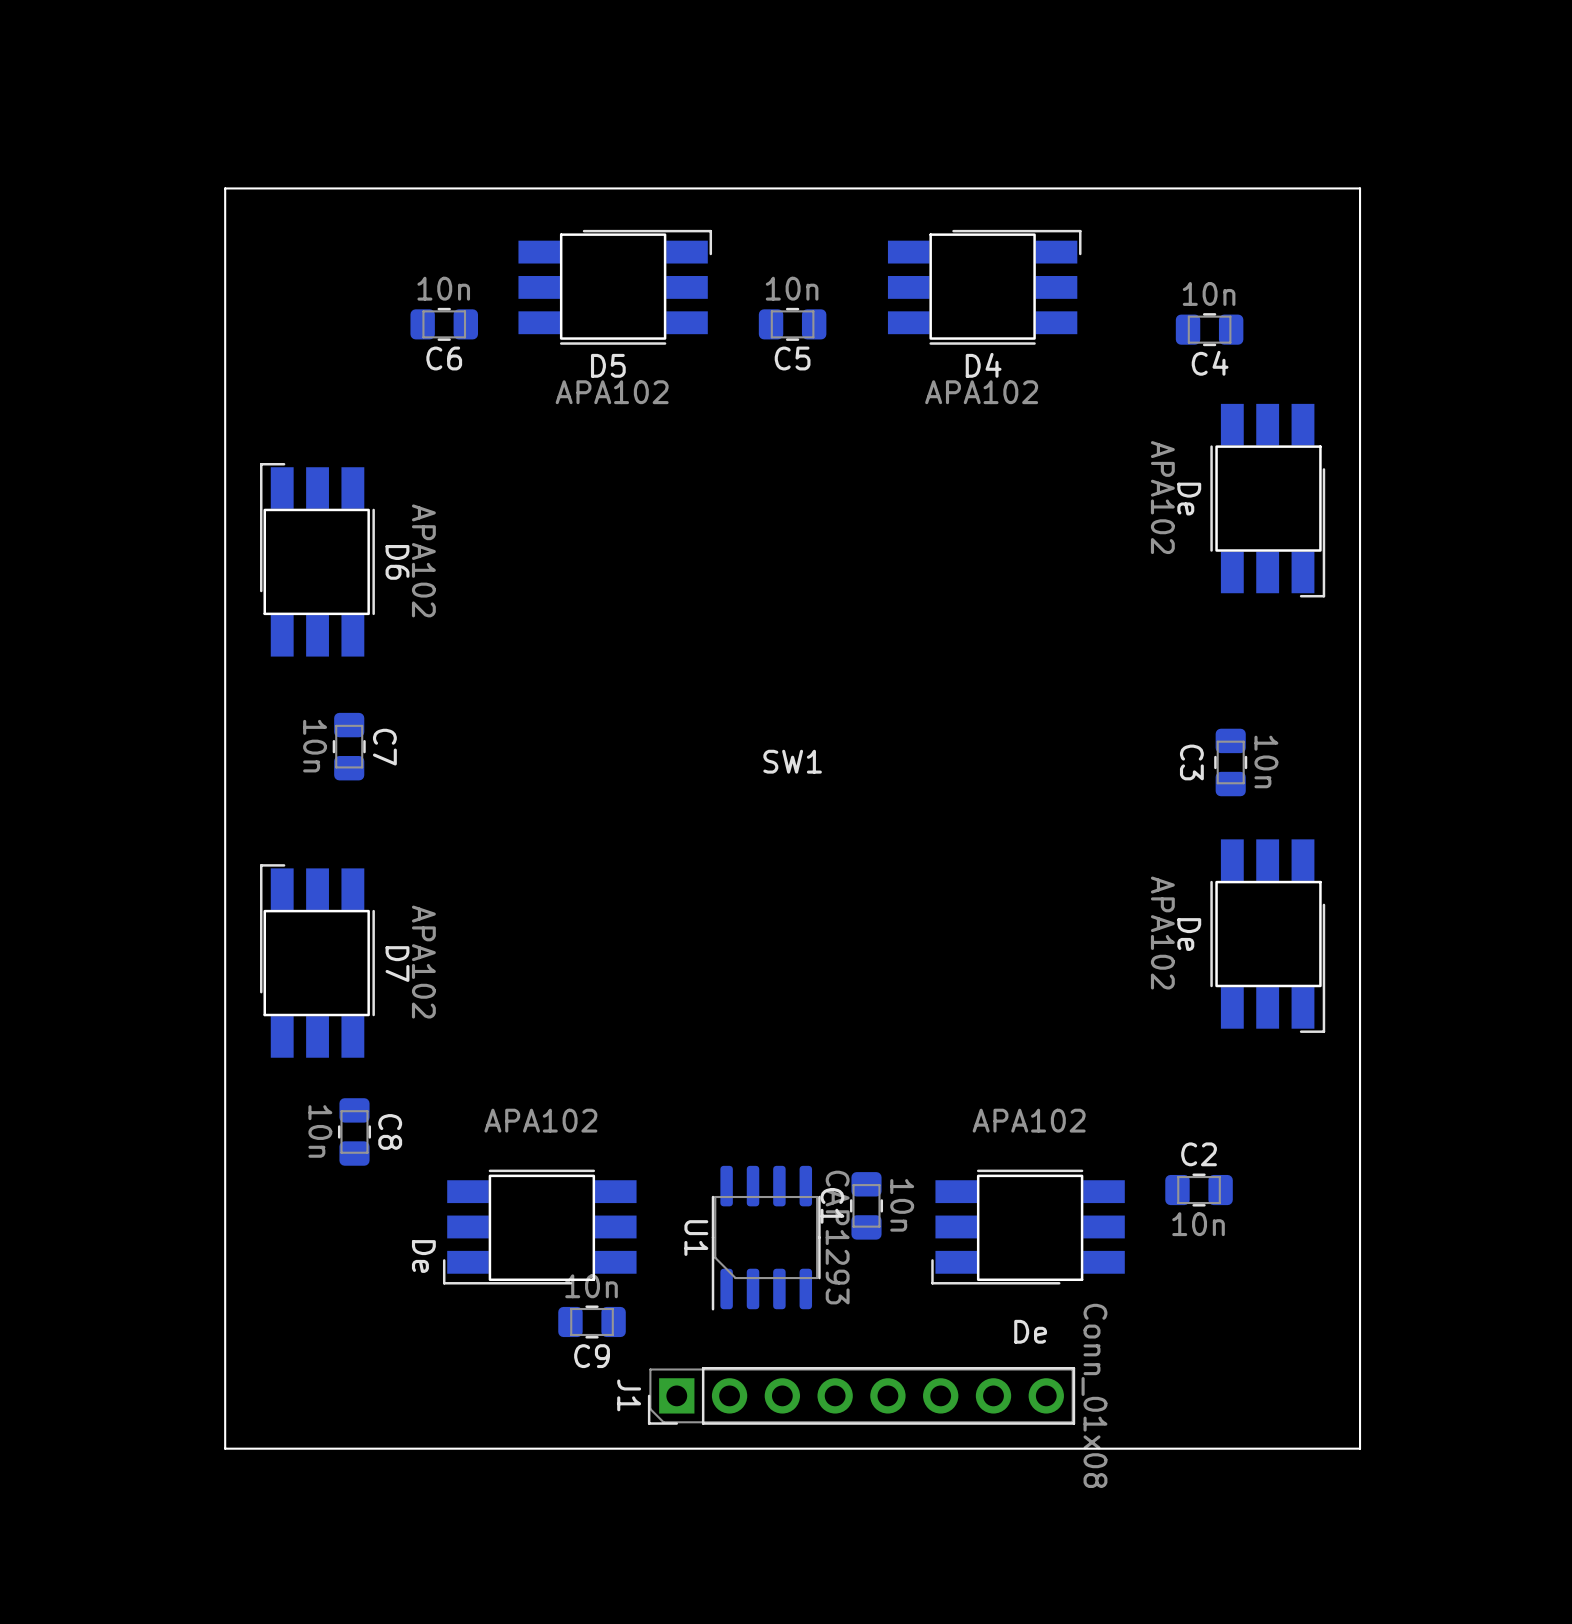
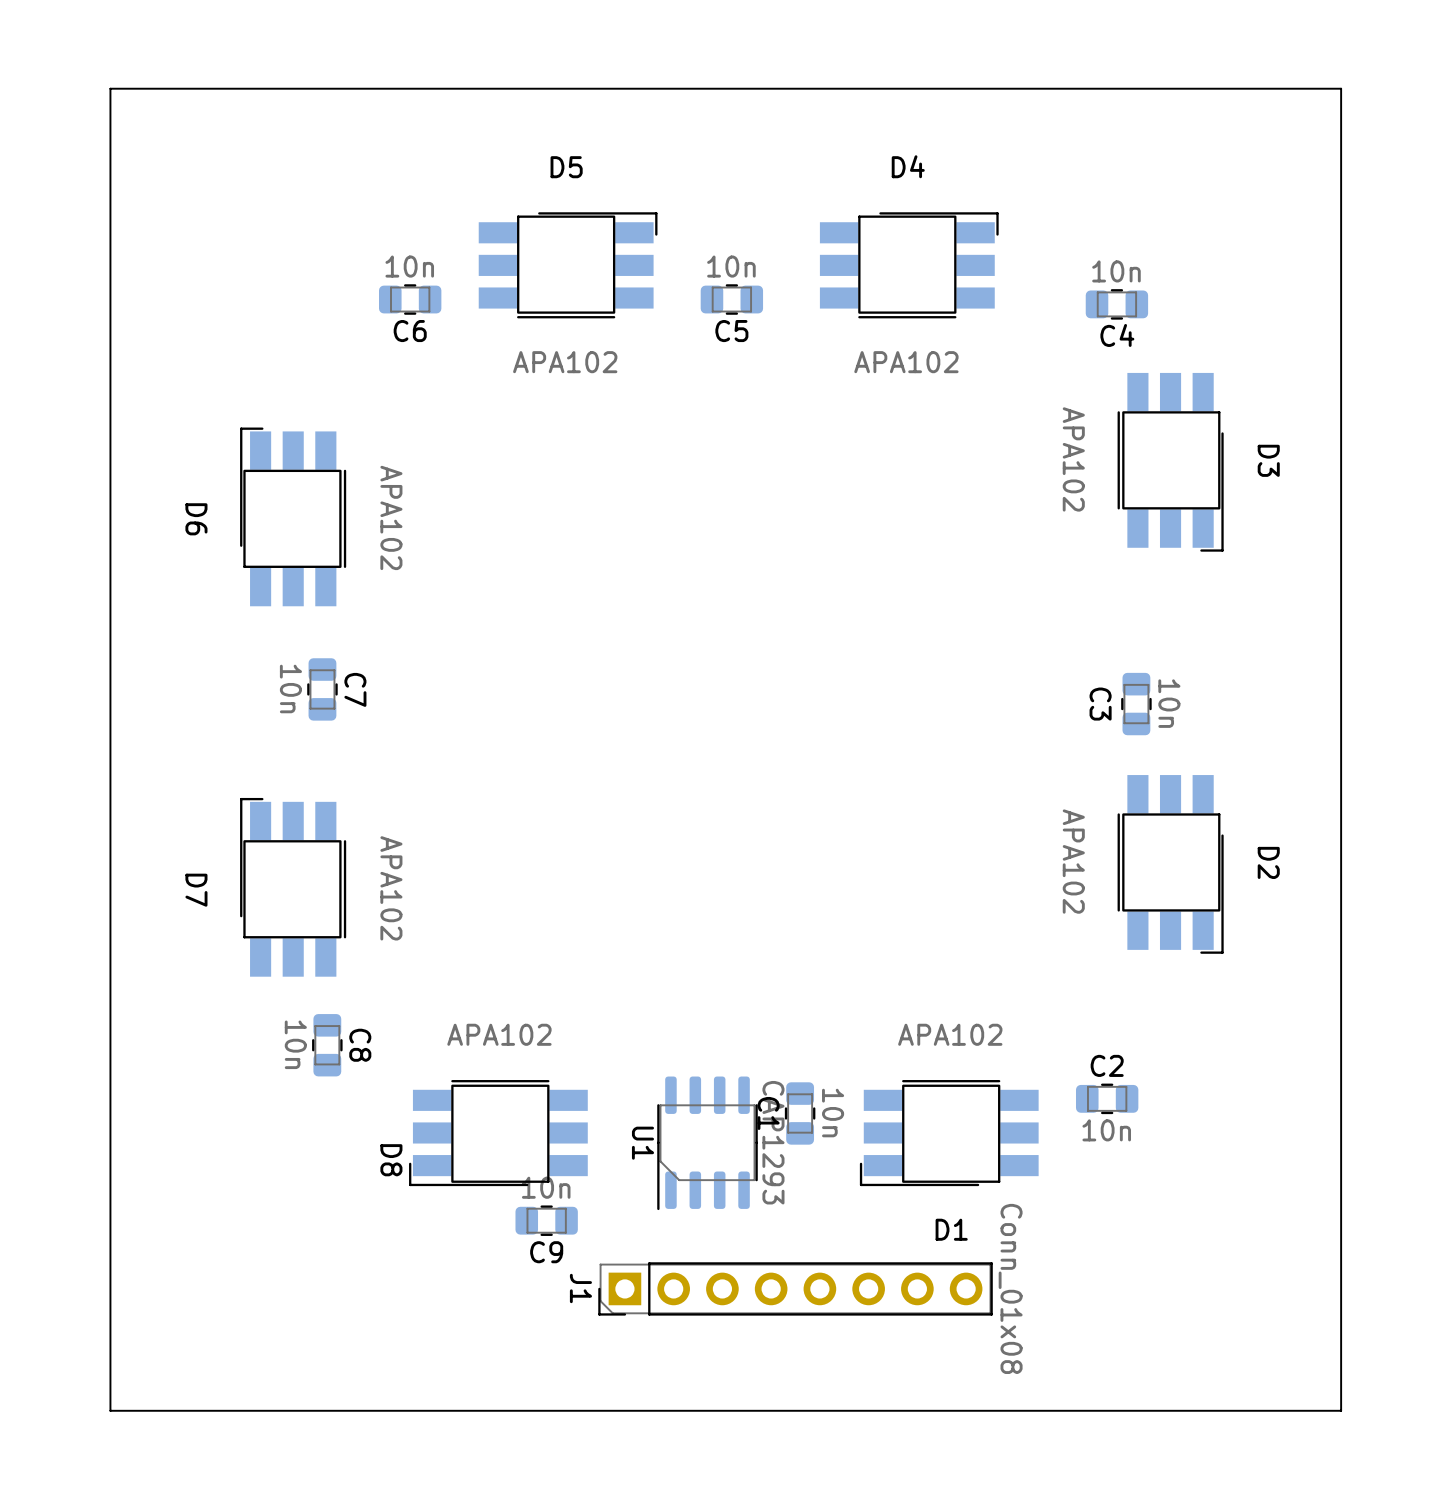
board edge: (1360, 188) (225, 188) (225, 1448) (1360, 1448) (1360, 188) -> (1341, 88) (1341, 1410) (110, 1410) (110, 88) (1341, 88)
D5 name position: D5 (608, 365) -> D5 (566, 167)
D4 name position: D4 (983, 365) -> D4 (908, 166)
De name: De (1189, 499) -> D3 (1268, 460)
D6 name position: D6 (397, 562) -> D6 (196, 519)
SW1: (792, 761) -> none
De name: De (1189, 934) -> D2 (1268, 862)
D7 name position: D7 (397, 964) -> D7 (196, 890)
De name: De (423, 1256) -> D8 (391, 1160)
De name: De (1030, 1331) -> D1 (951, 1229)

